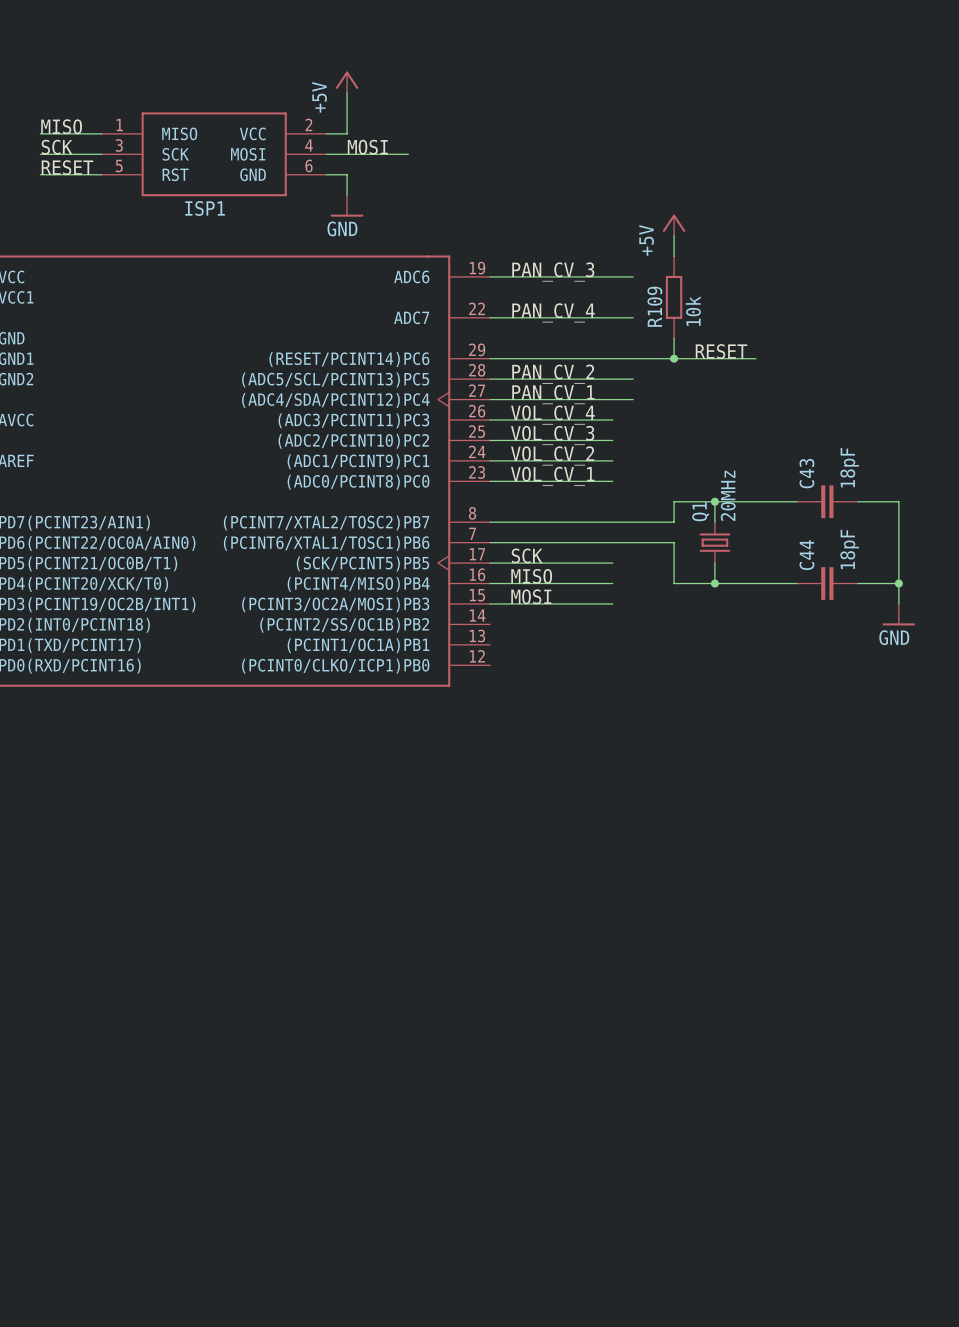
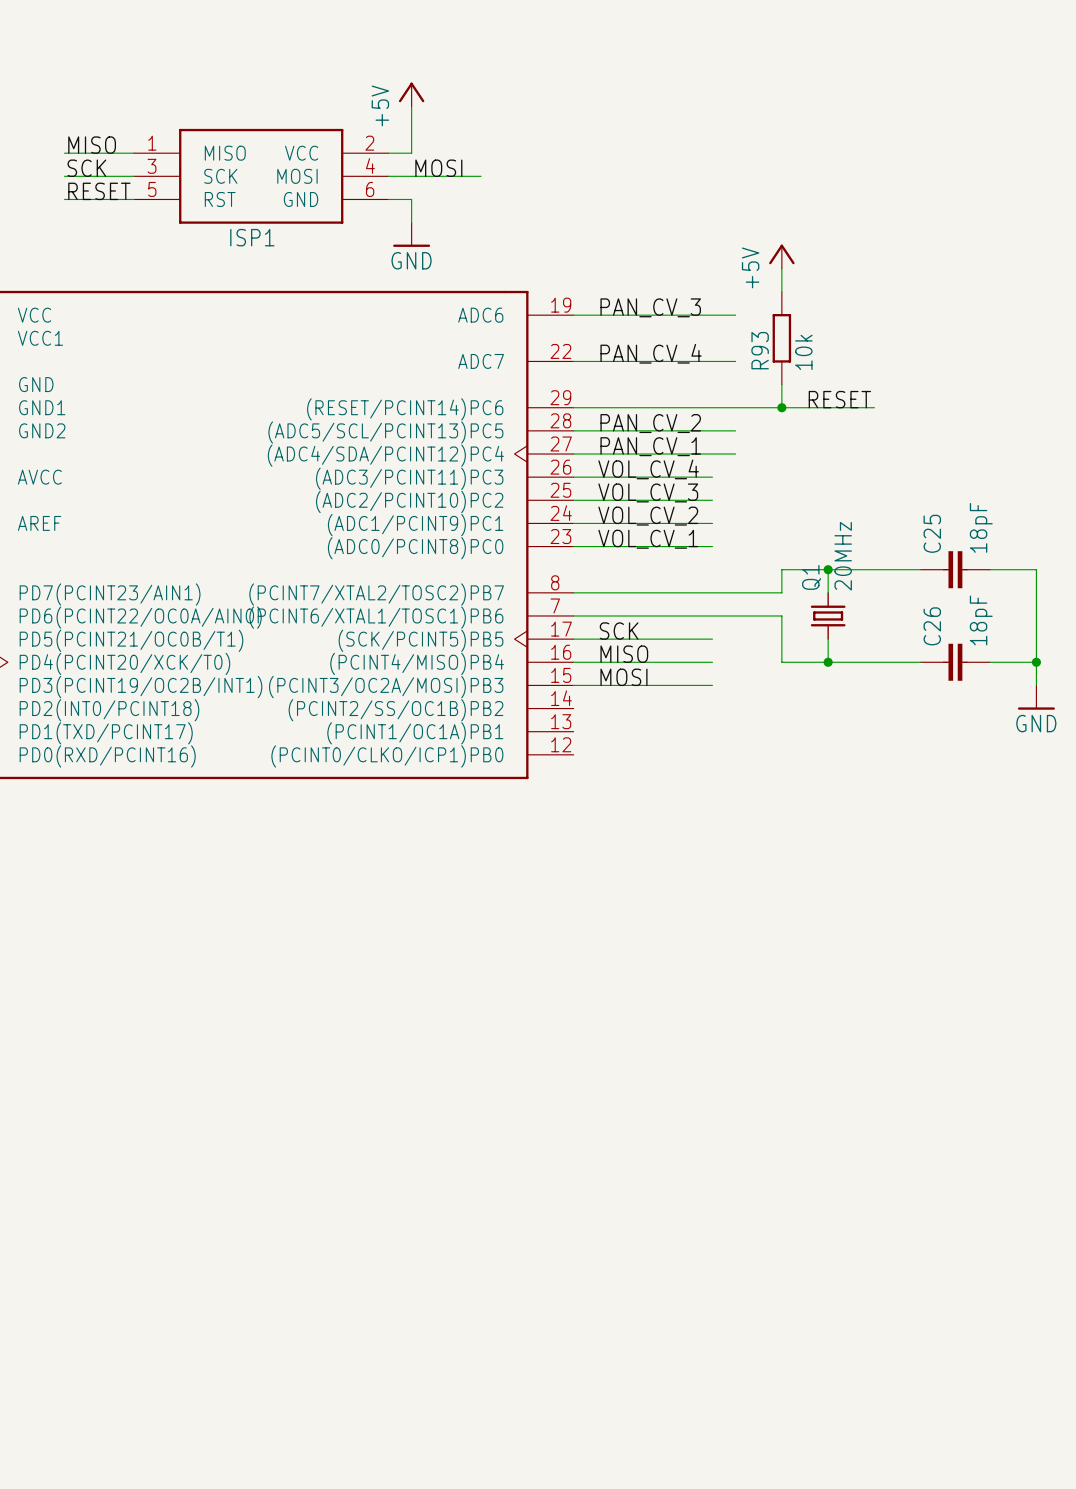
R109 name: R109 (654, 306) -> R93 (760, 350)
C43 name: C43 (806, 473) -> C25 (932, 533)
C44 name: C44 (806, 555) -> C26 (932, 626)

